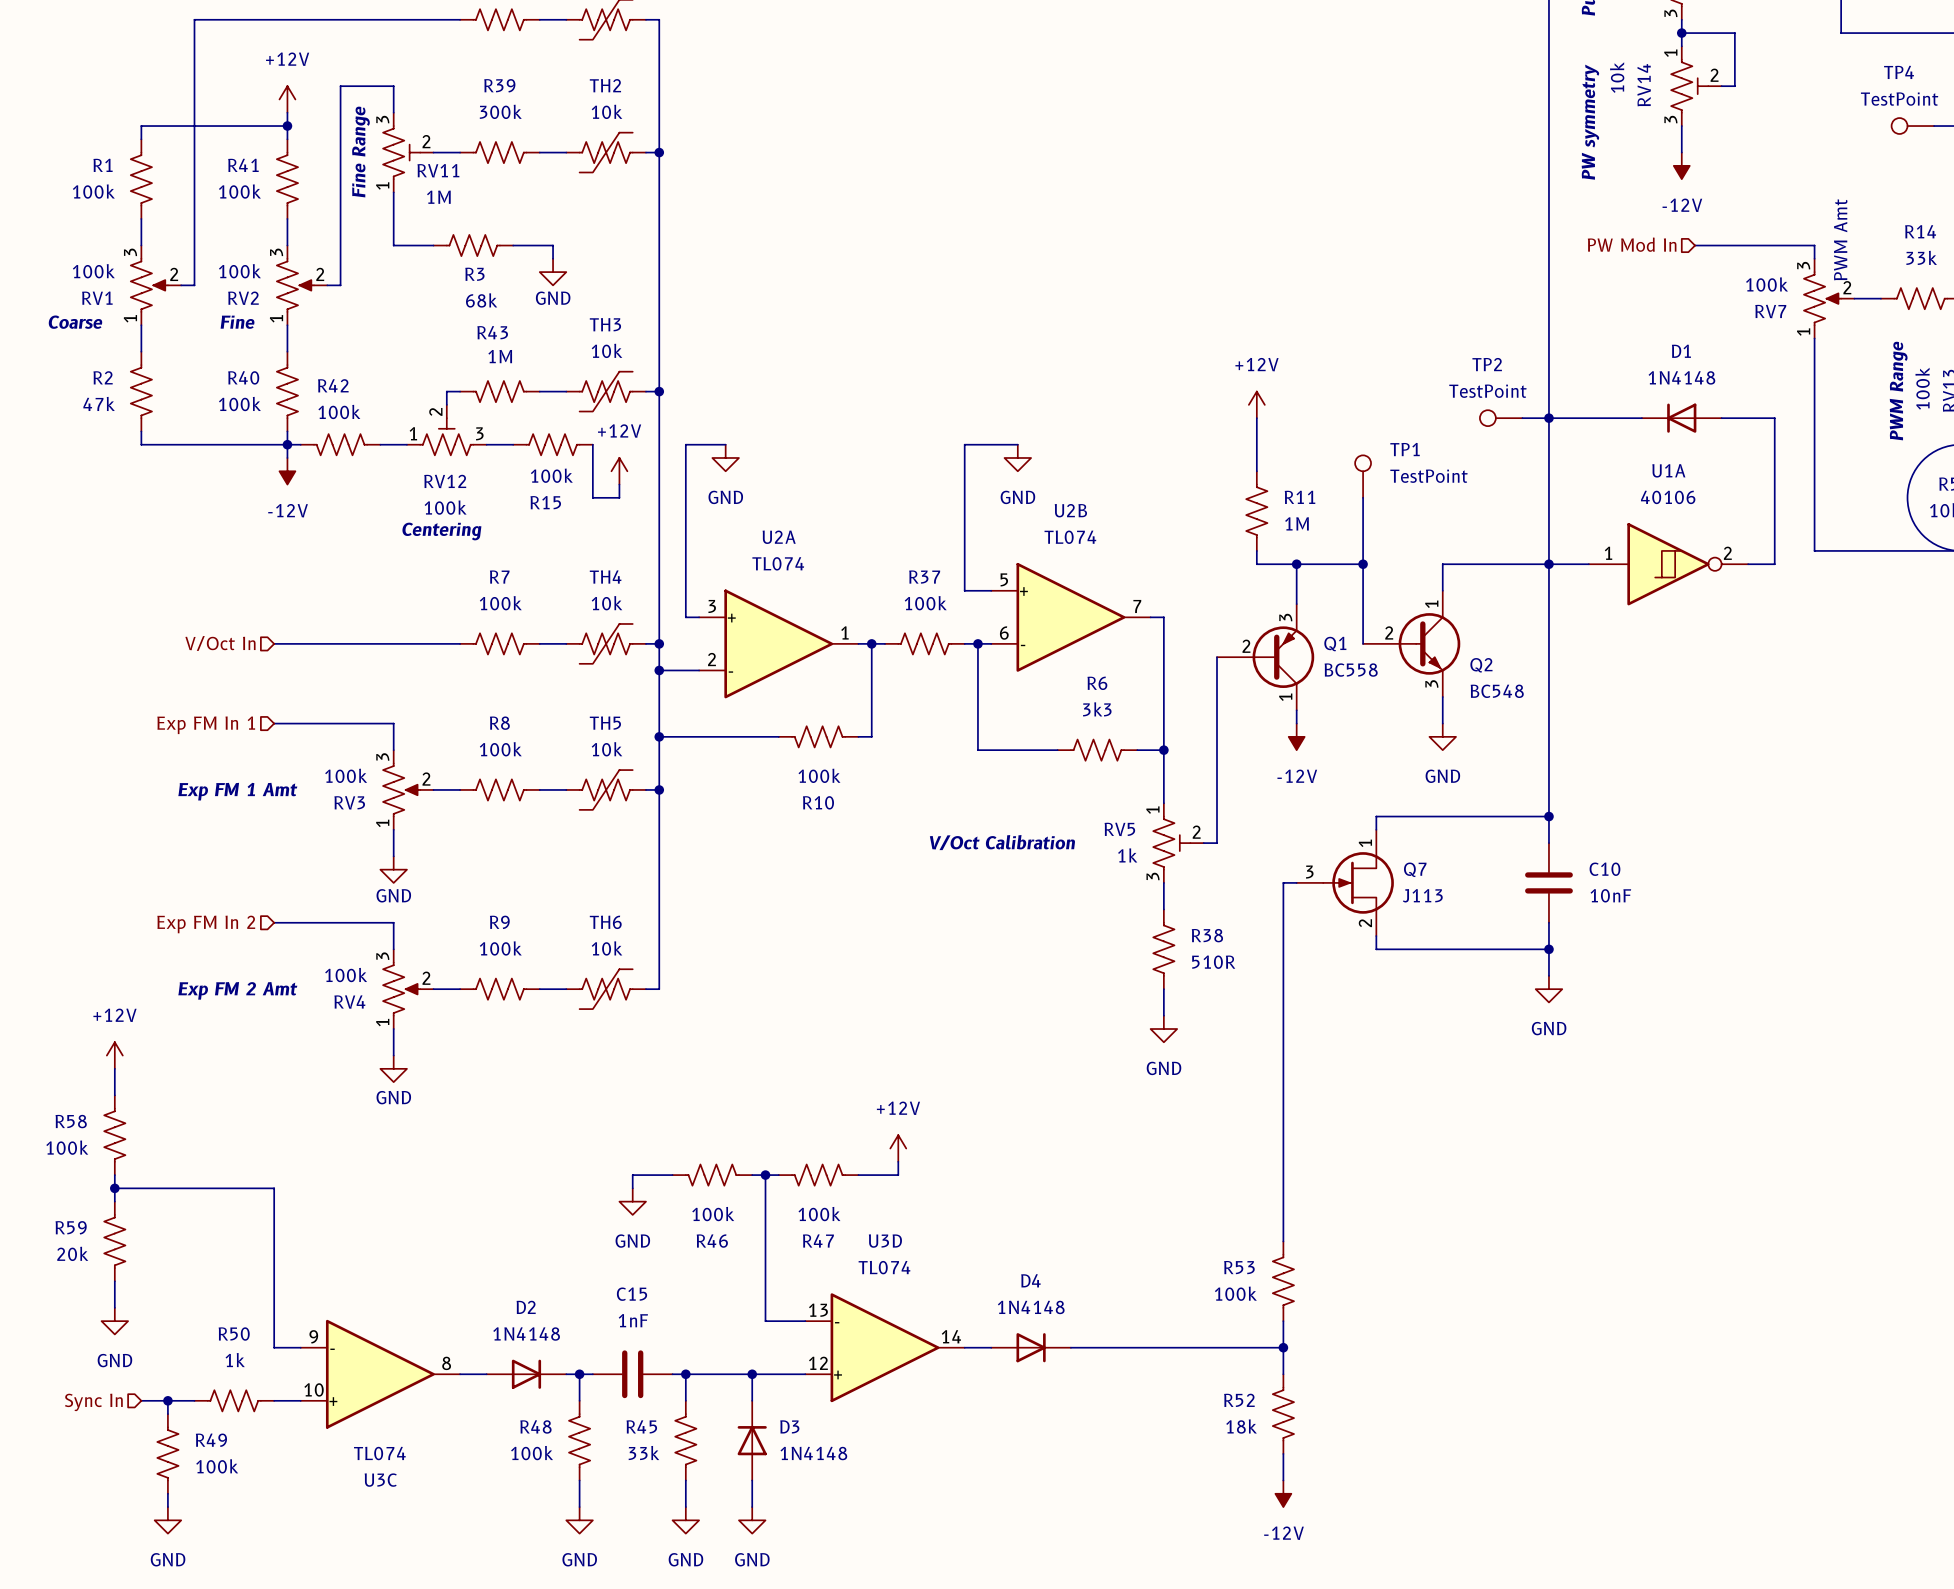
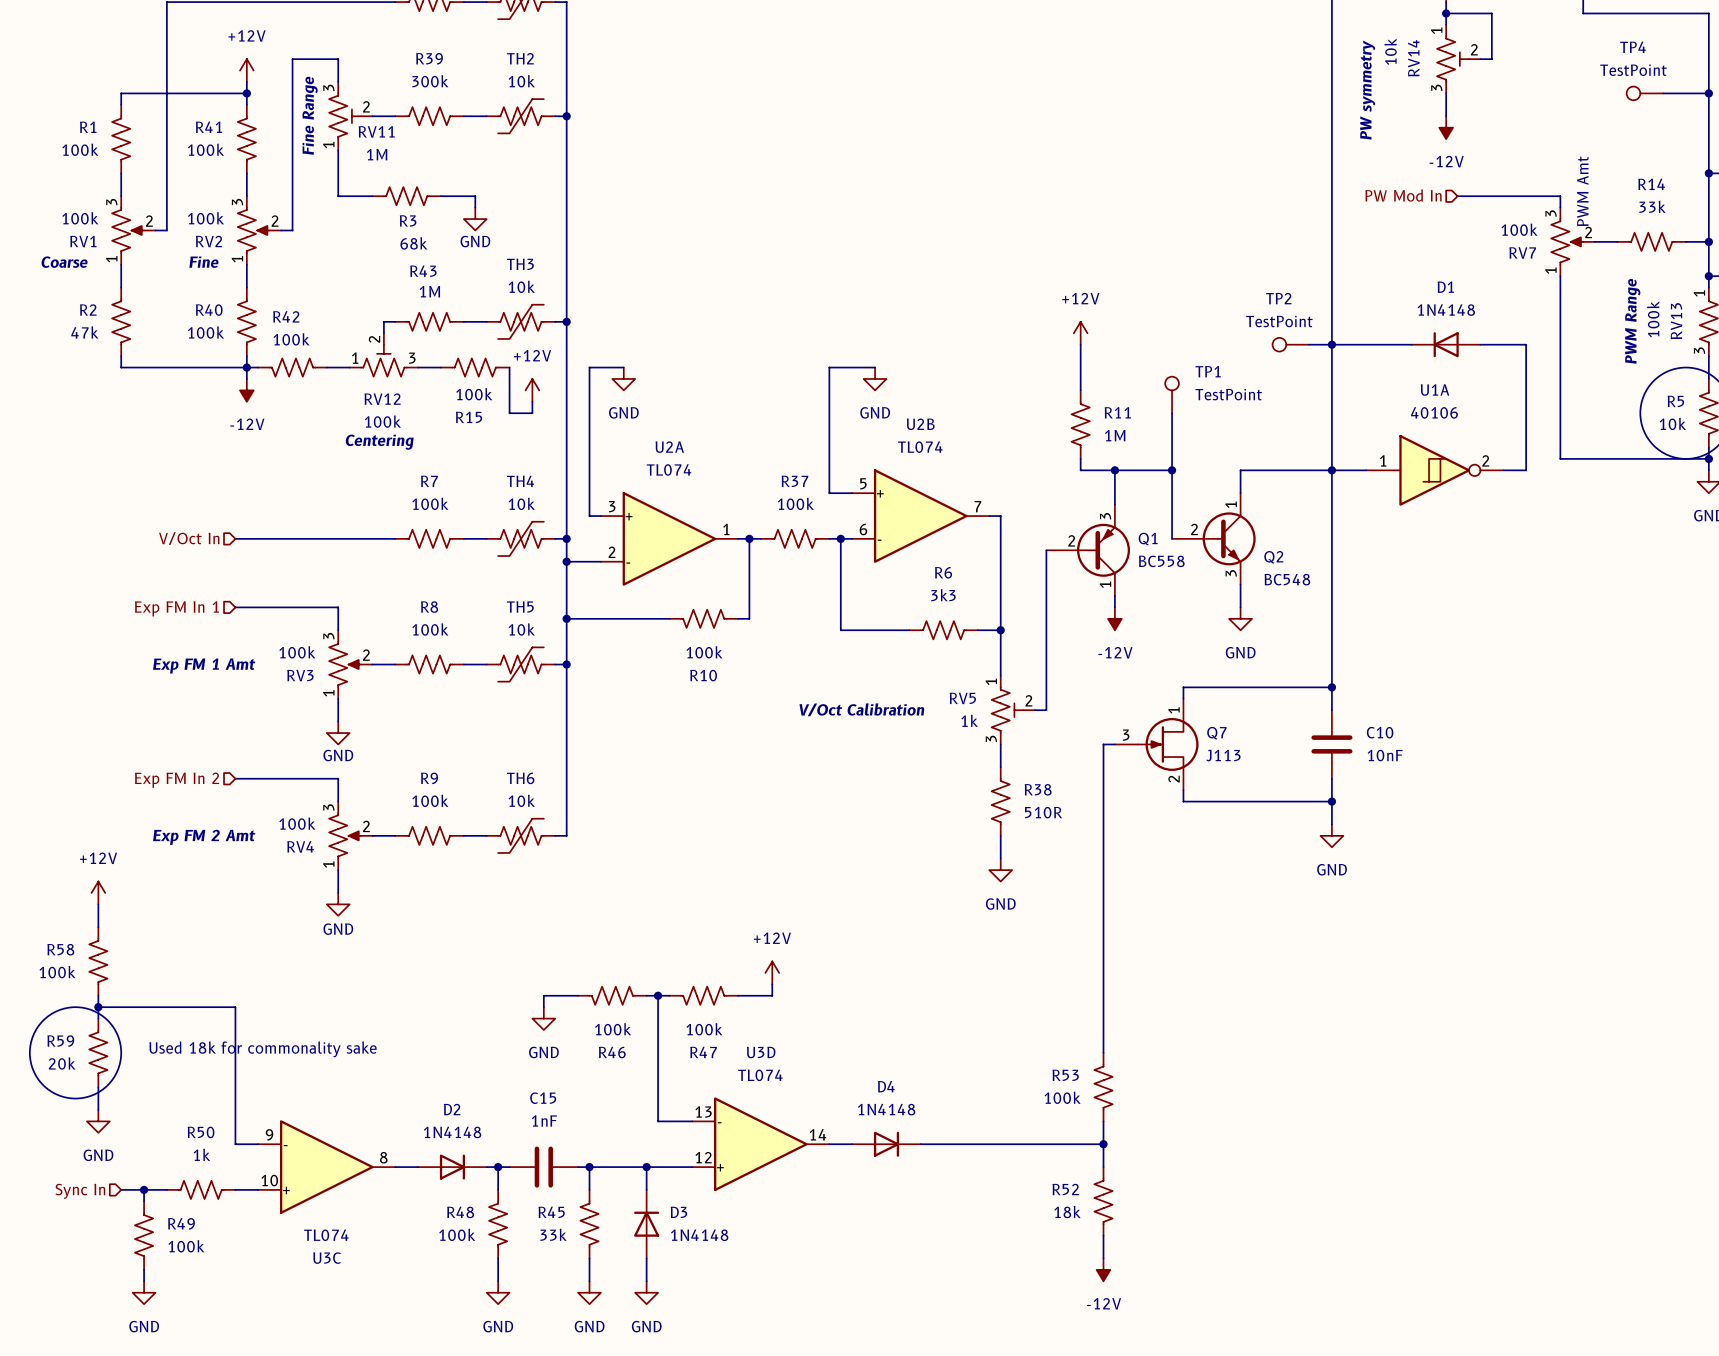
drawing: none -> [29, 1007, 122, 1099]
text: none -> Used 18k for commonality sake (262, 1049)

